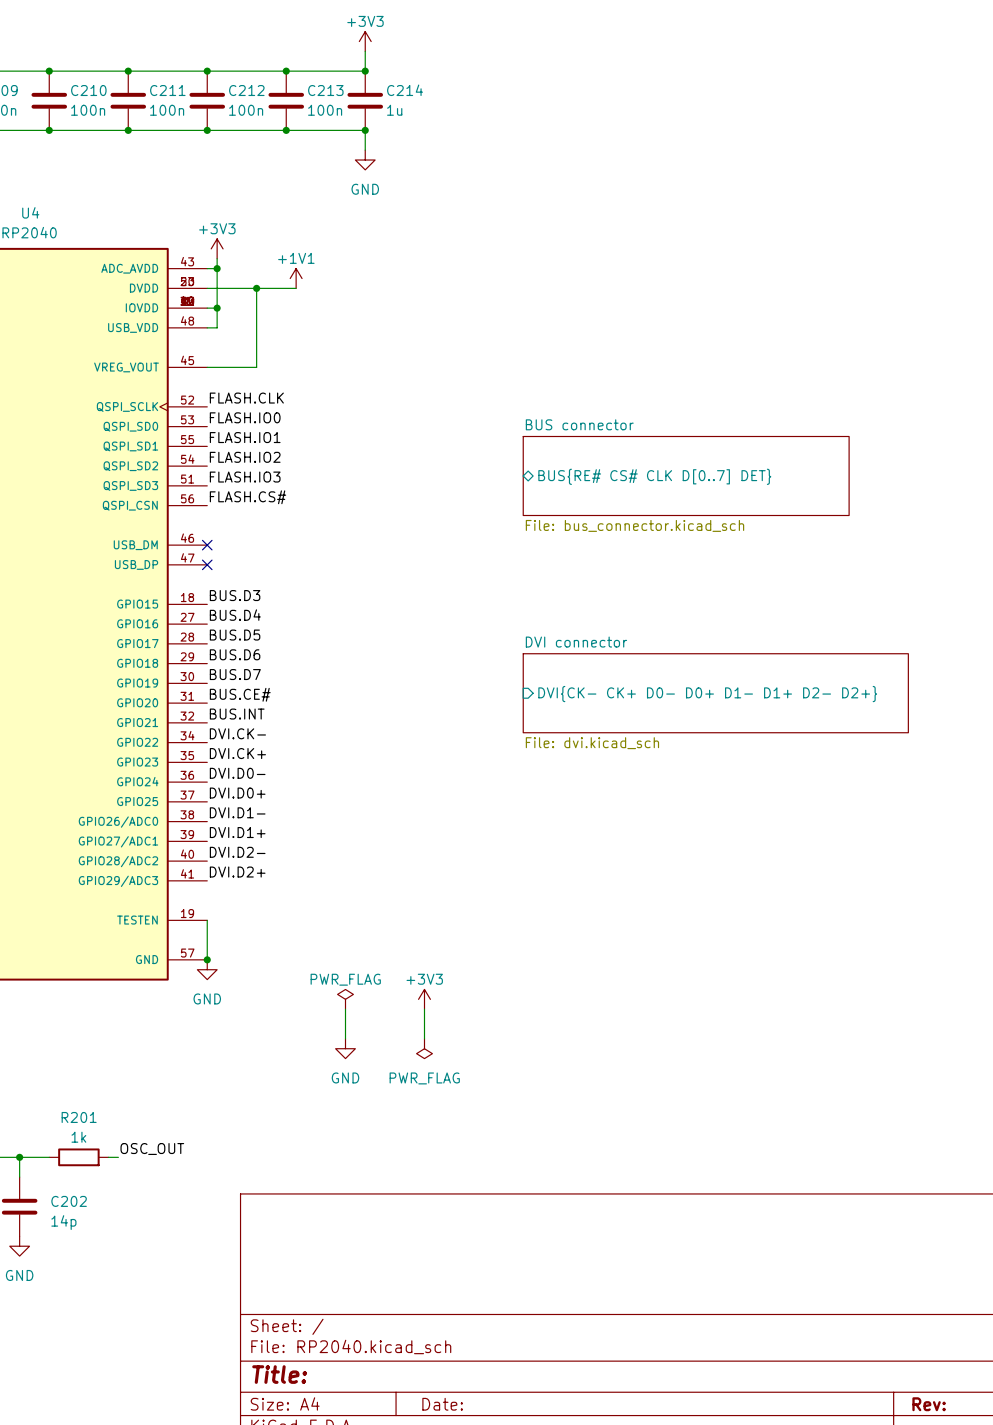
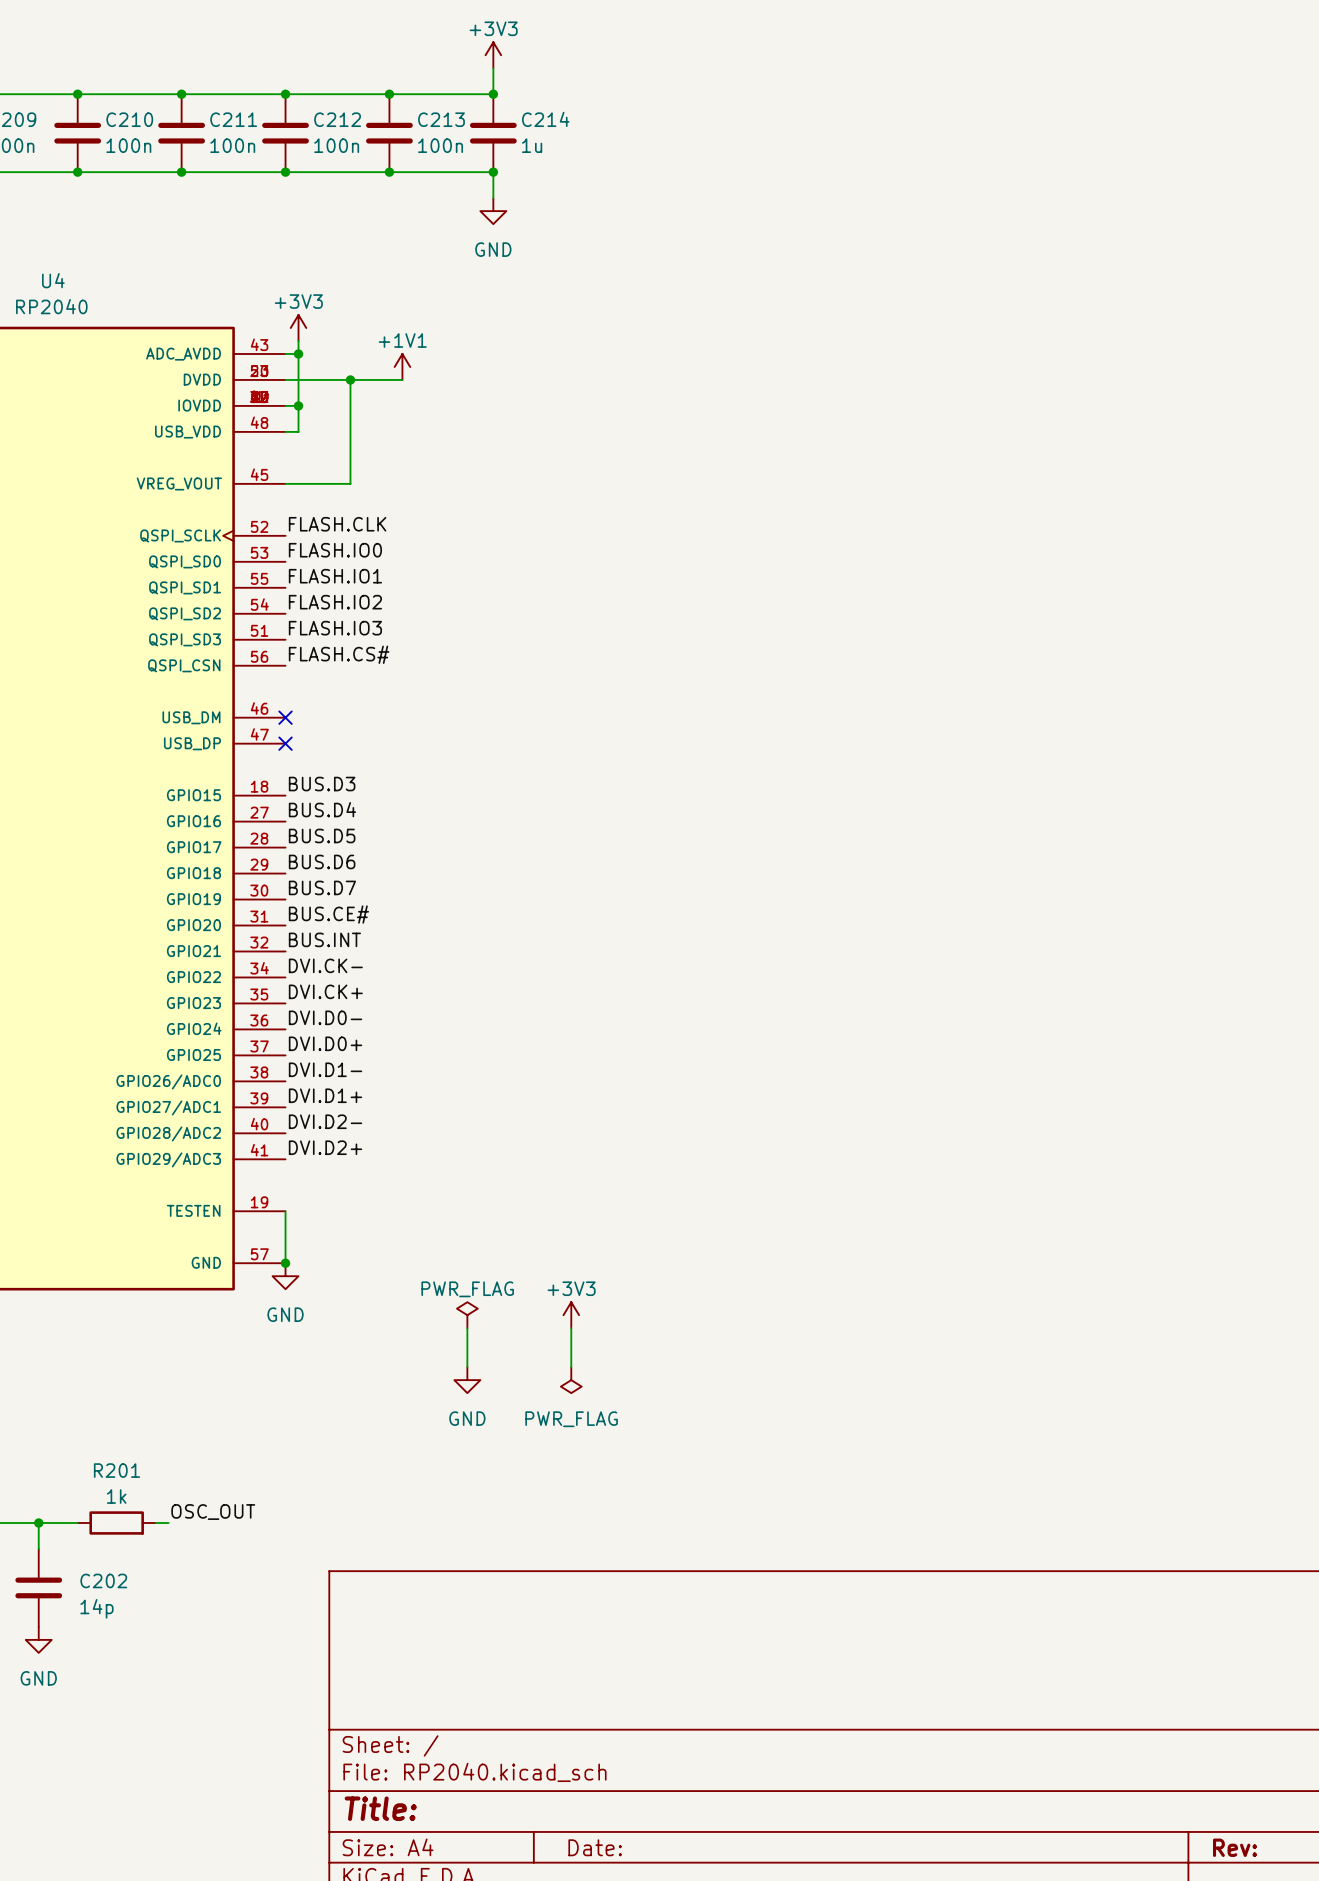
sheet BUS connector: File: bus_connector.kicad_sch (686, 475) -> none
sheet pin: BUS{RE# CS# CLK D[0..7] DET} (654, 476) -> none
sheet DVI connector: File: dvi.kicad_sch (715, 693) -> none
sheet pin: DVI{CK- CK+ D0- D0+ D1- D1+ D2- D2+} (707, 694) -> none

